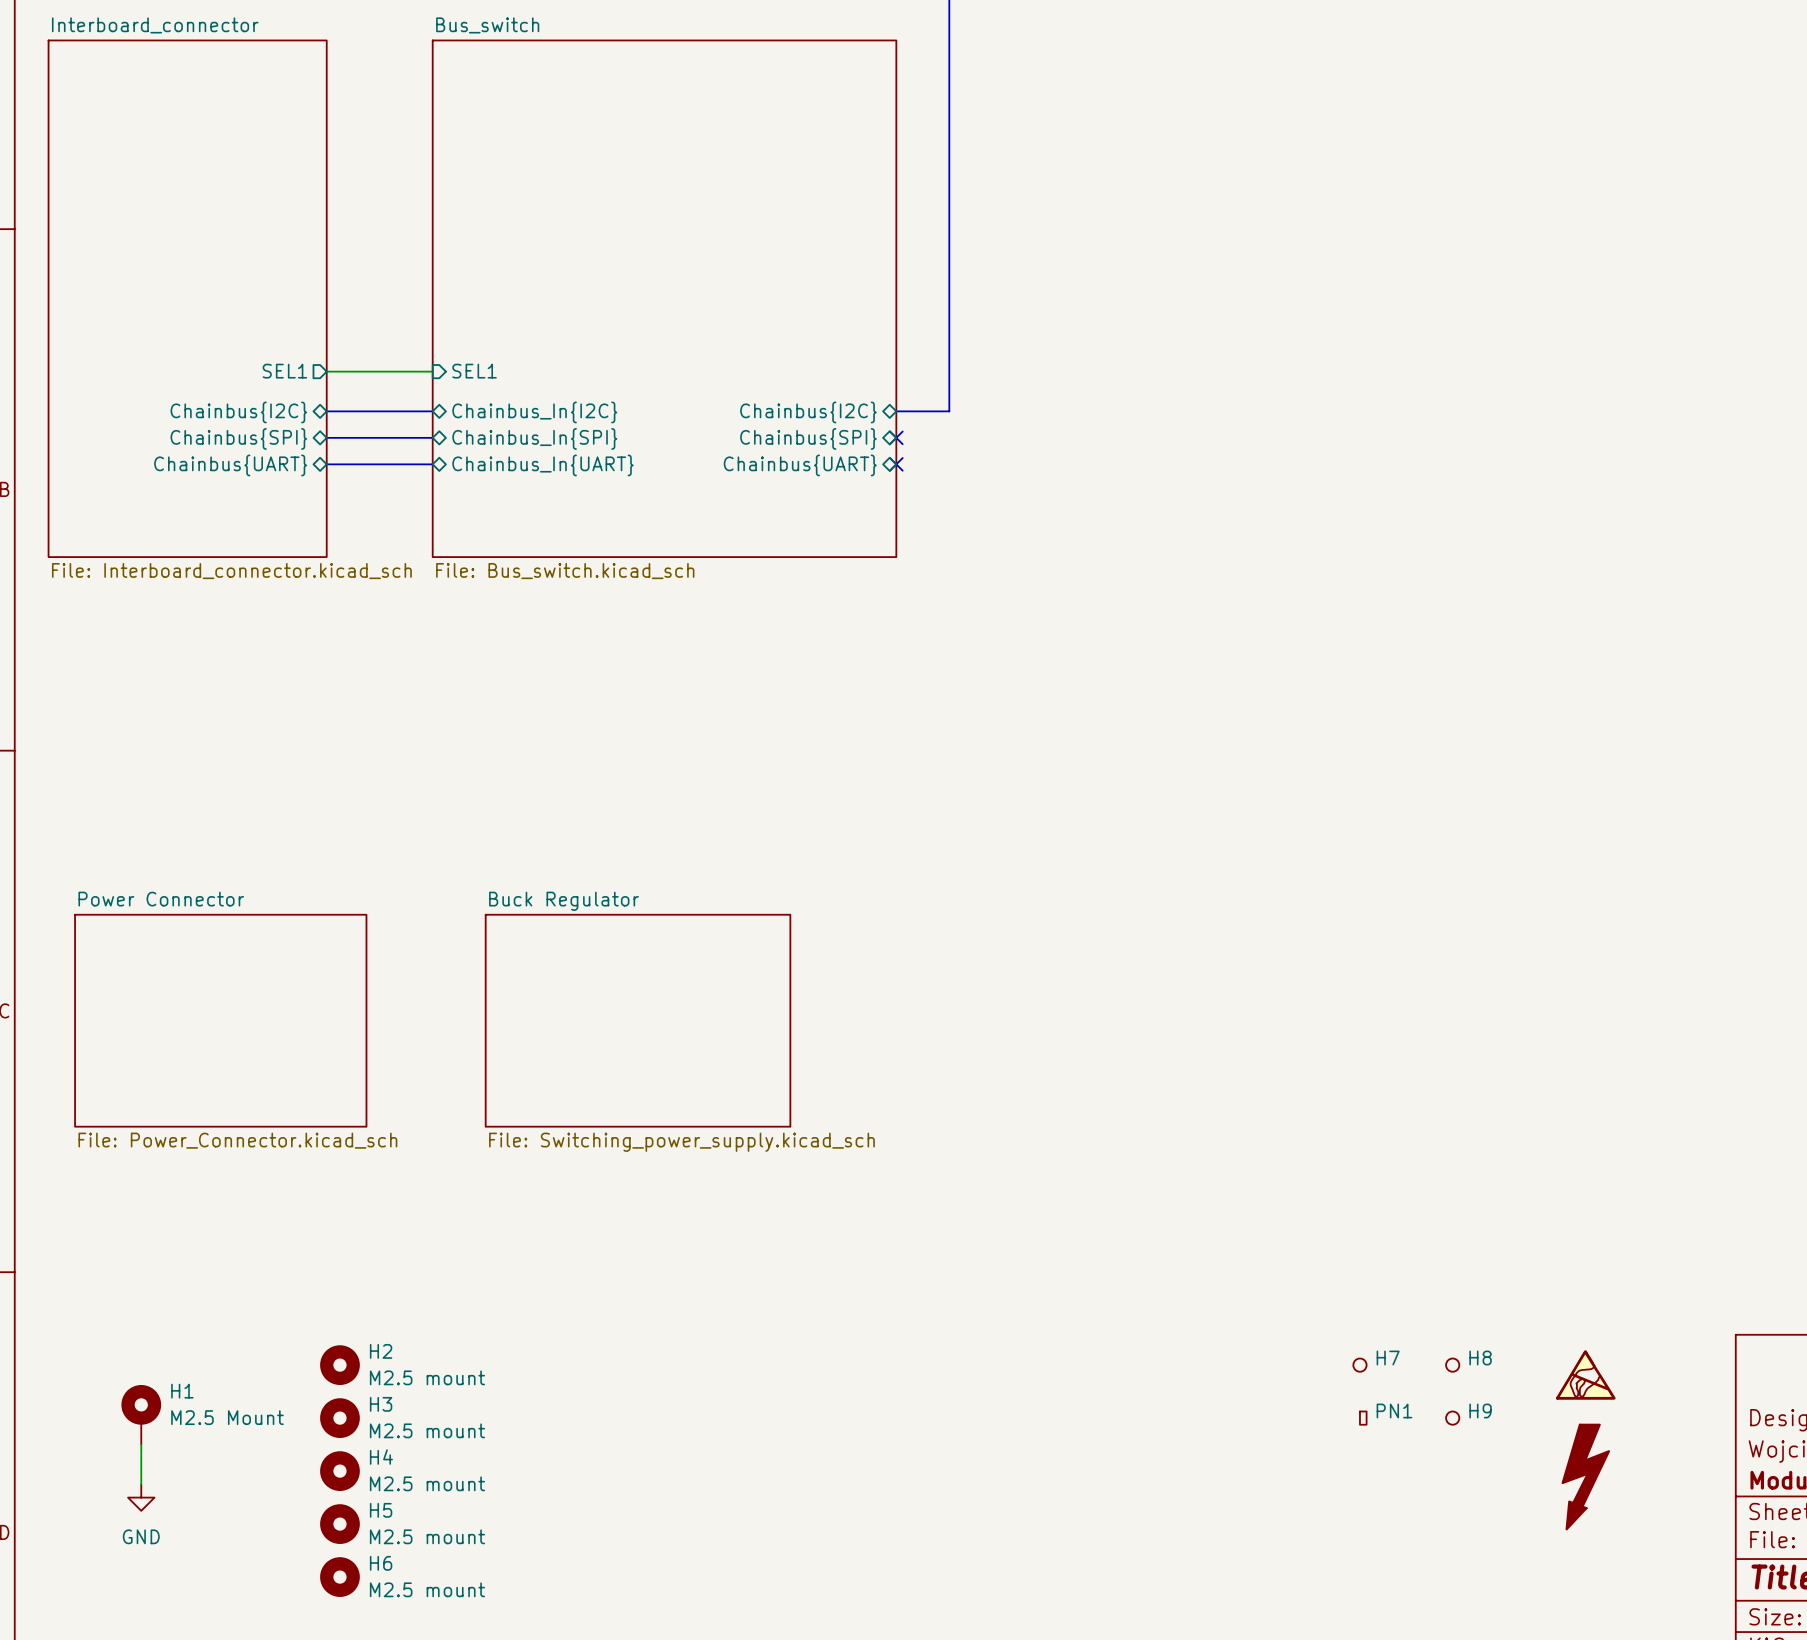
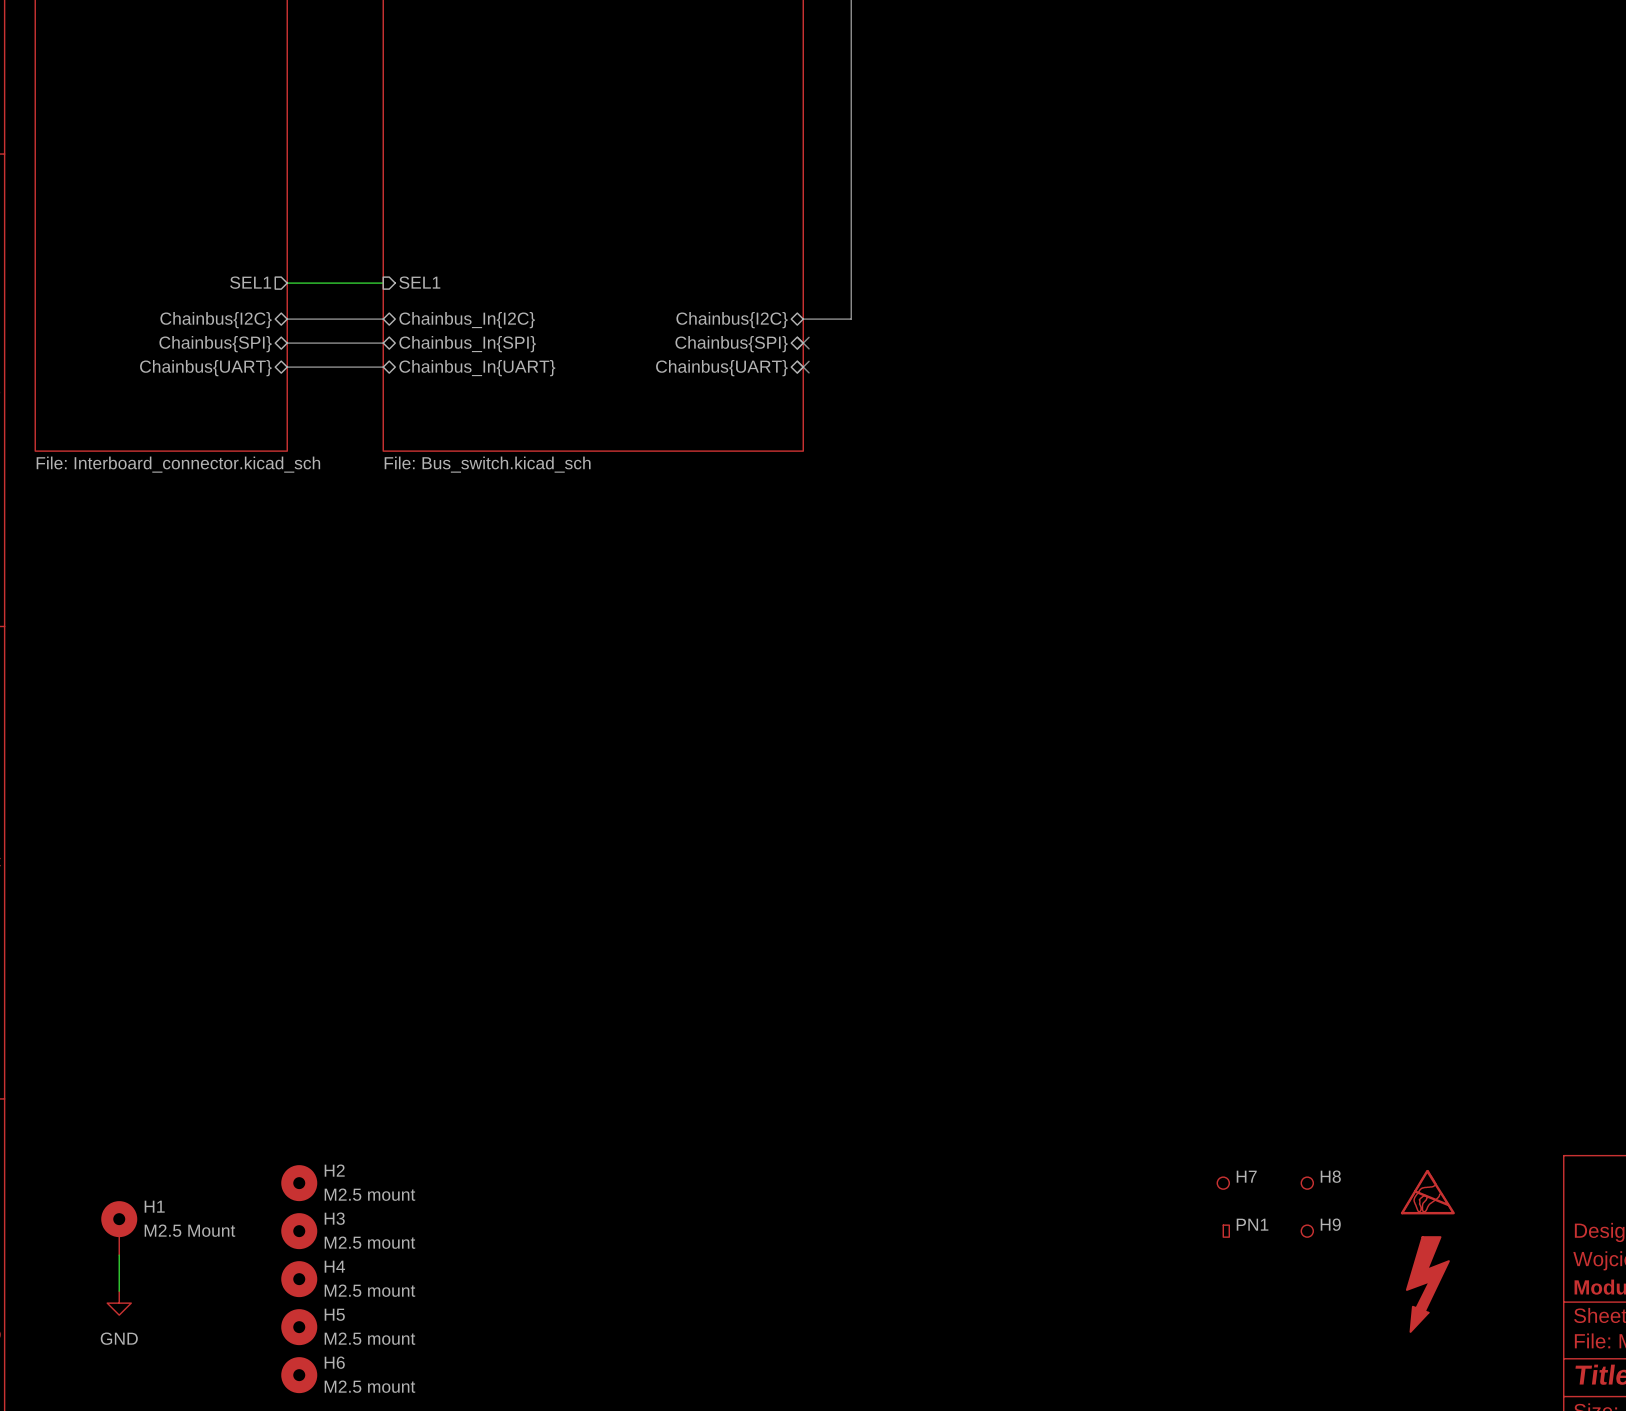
sheet Power Connector: File: Power_Connector.kicad_sch (220, 1020) -> none
sheet Buck Regulator: File: Switching_power_supply.kicad_sch (638, 1020) -> none

